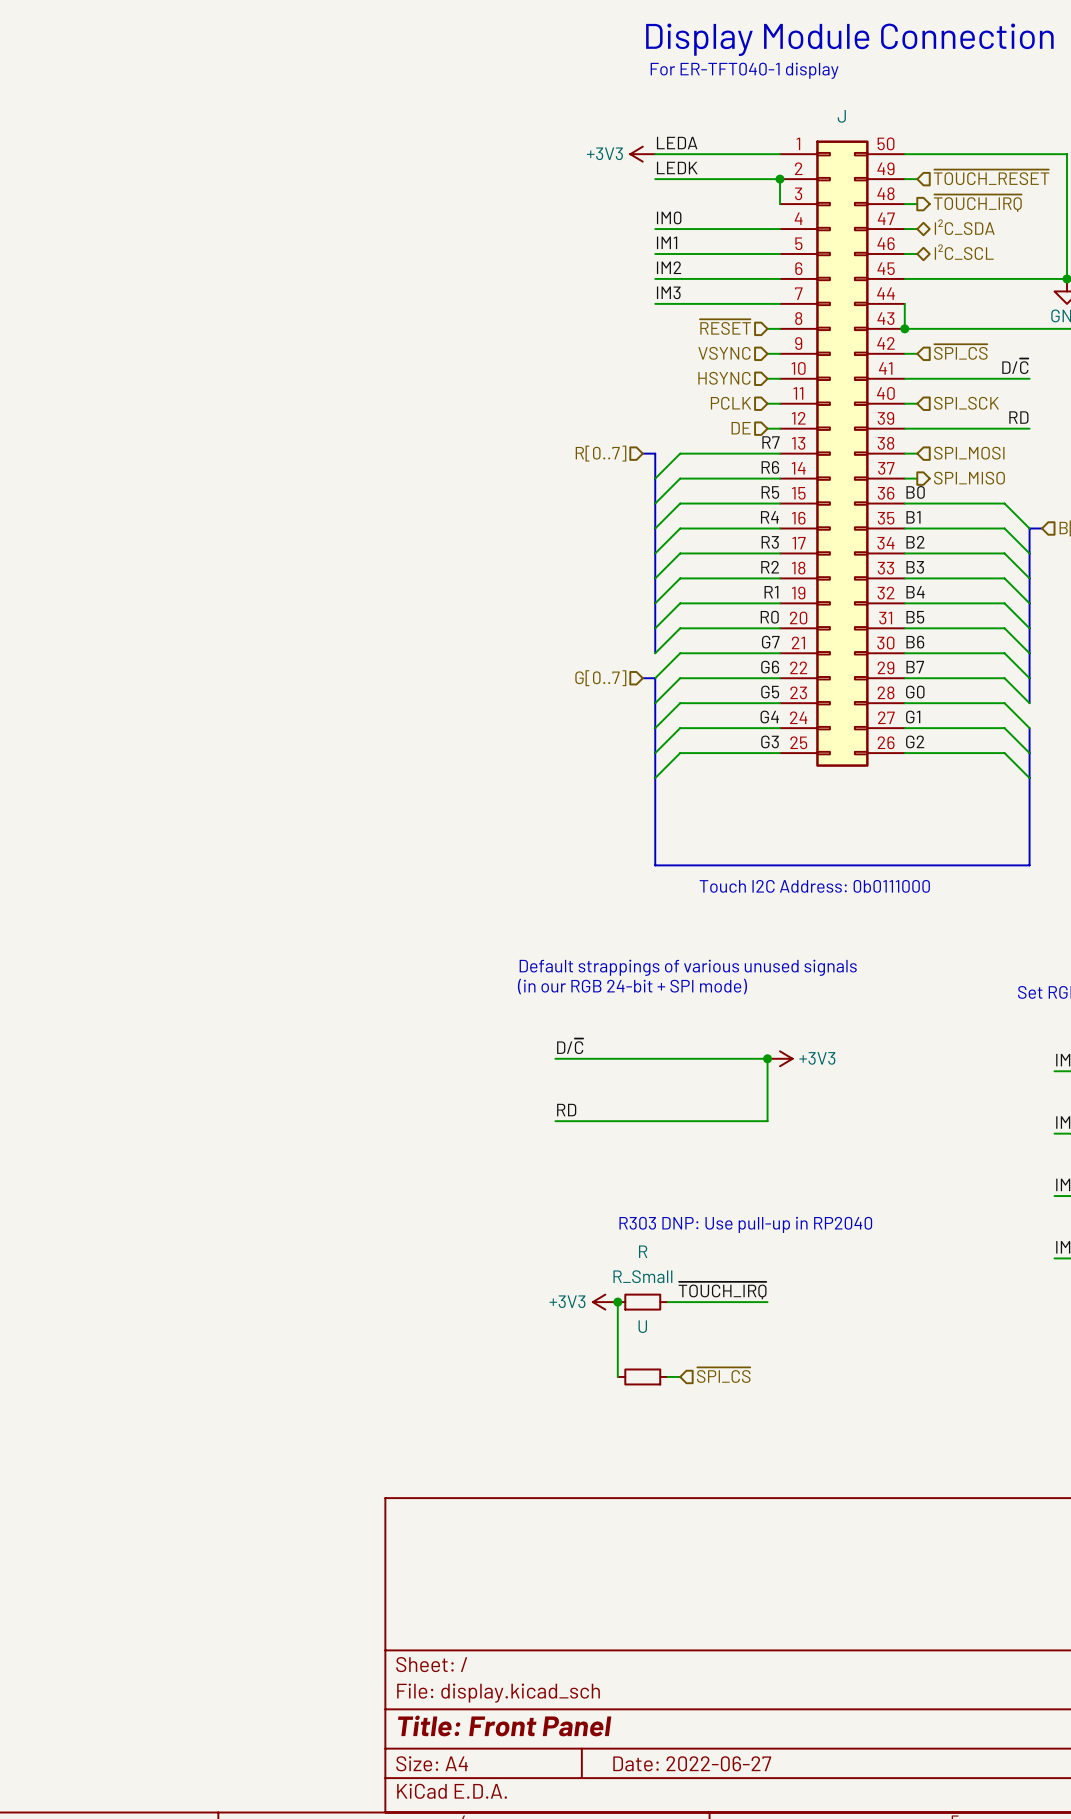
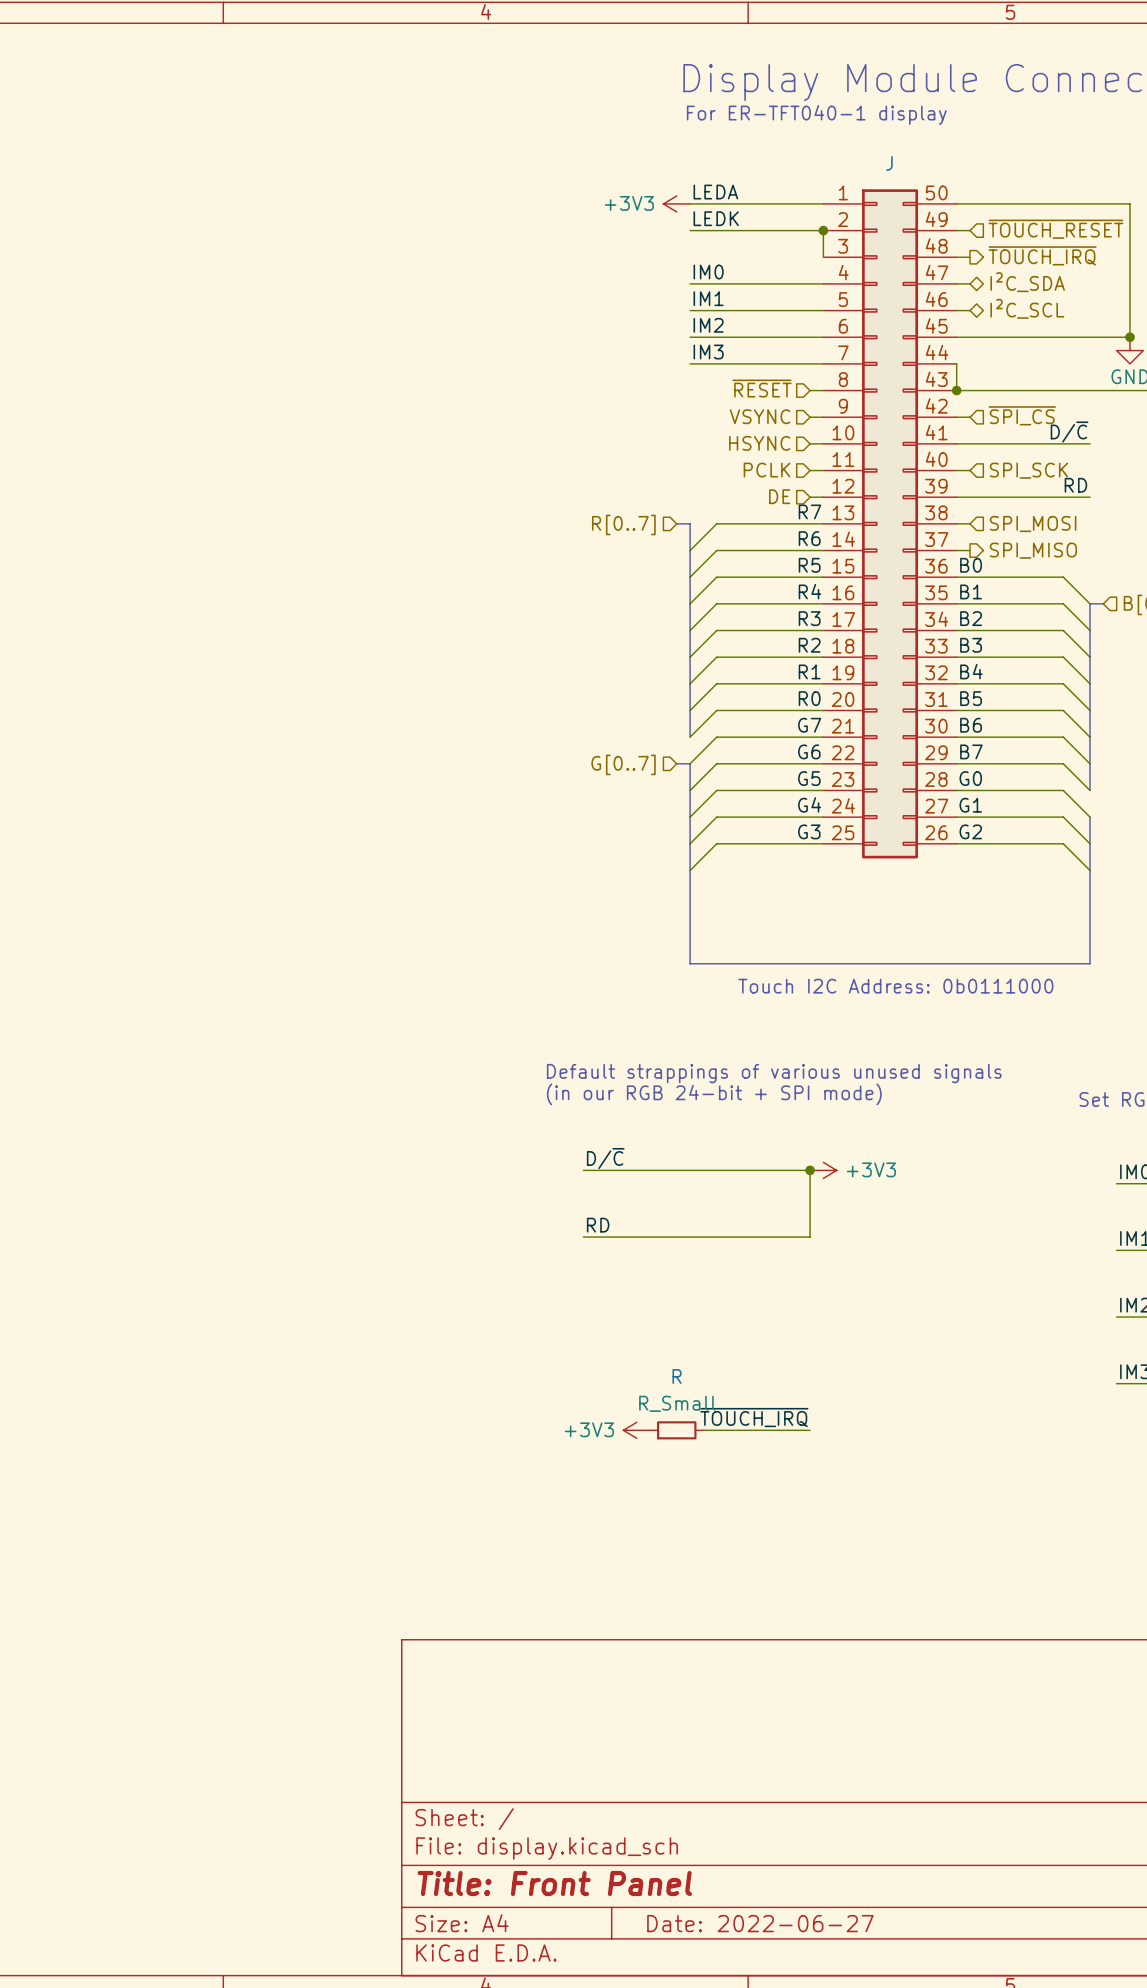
text: R303 DNP: Use pull-up in RP2040 (745, 1224) -> none
wire: (617, 1302) (617, 1376) -> none
junction: (617, 1302) -> none
hierarchical label: ~{SPI_CS} (723, 1375) -> none
U: (642, 1376) -> none
wire: (667, 1376) (680, 1376) -> none

